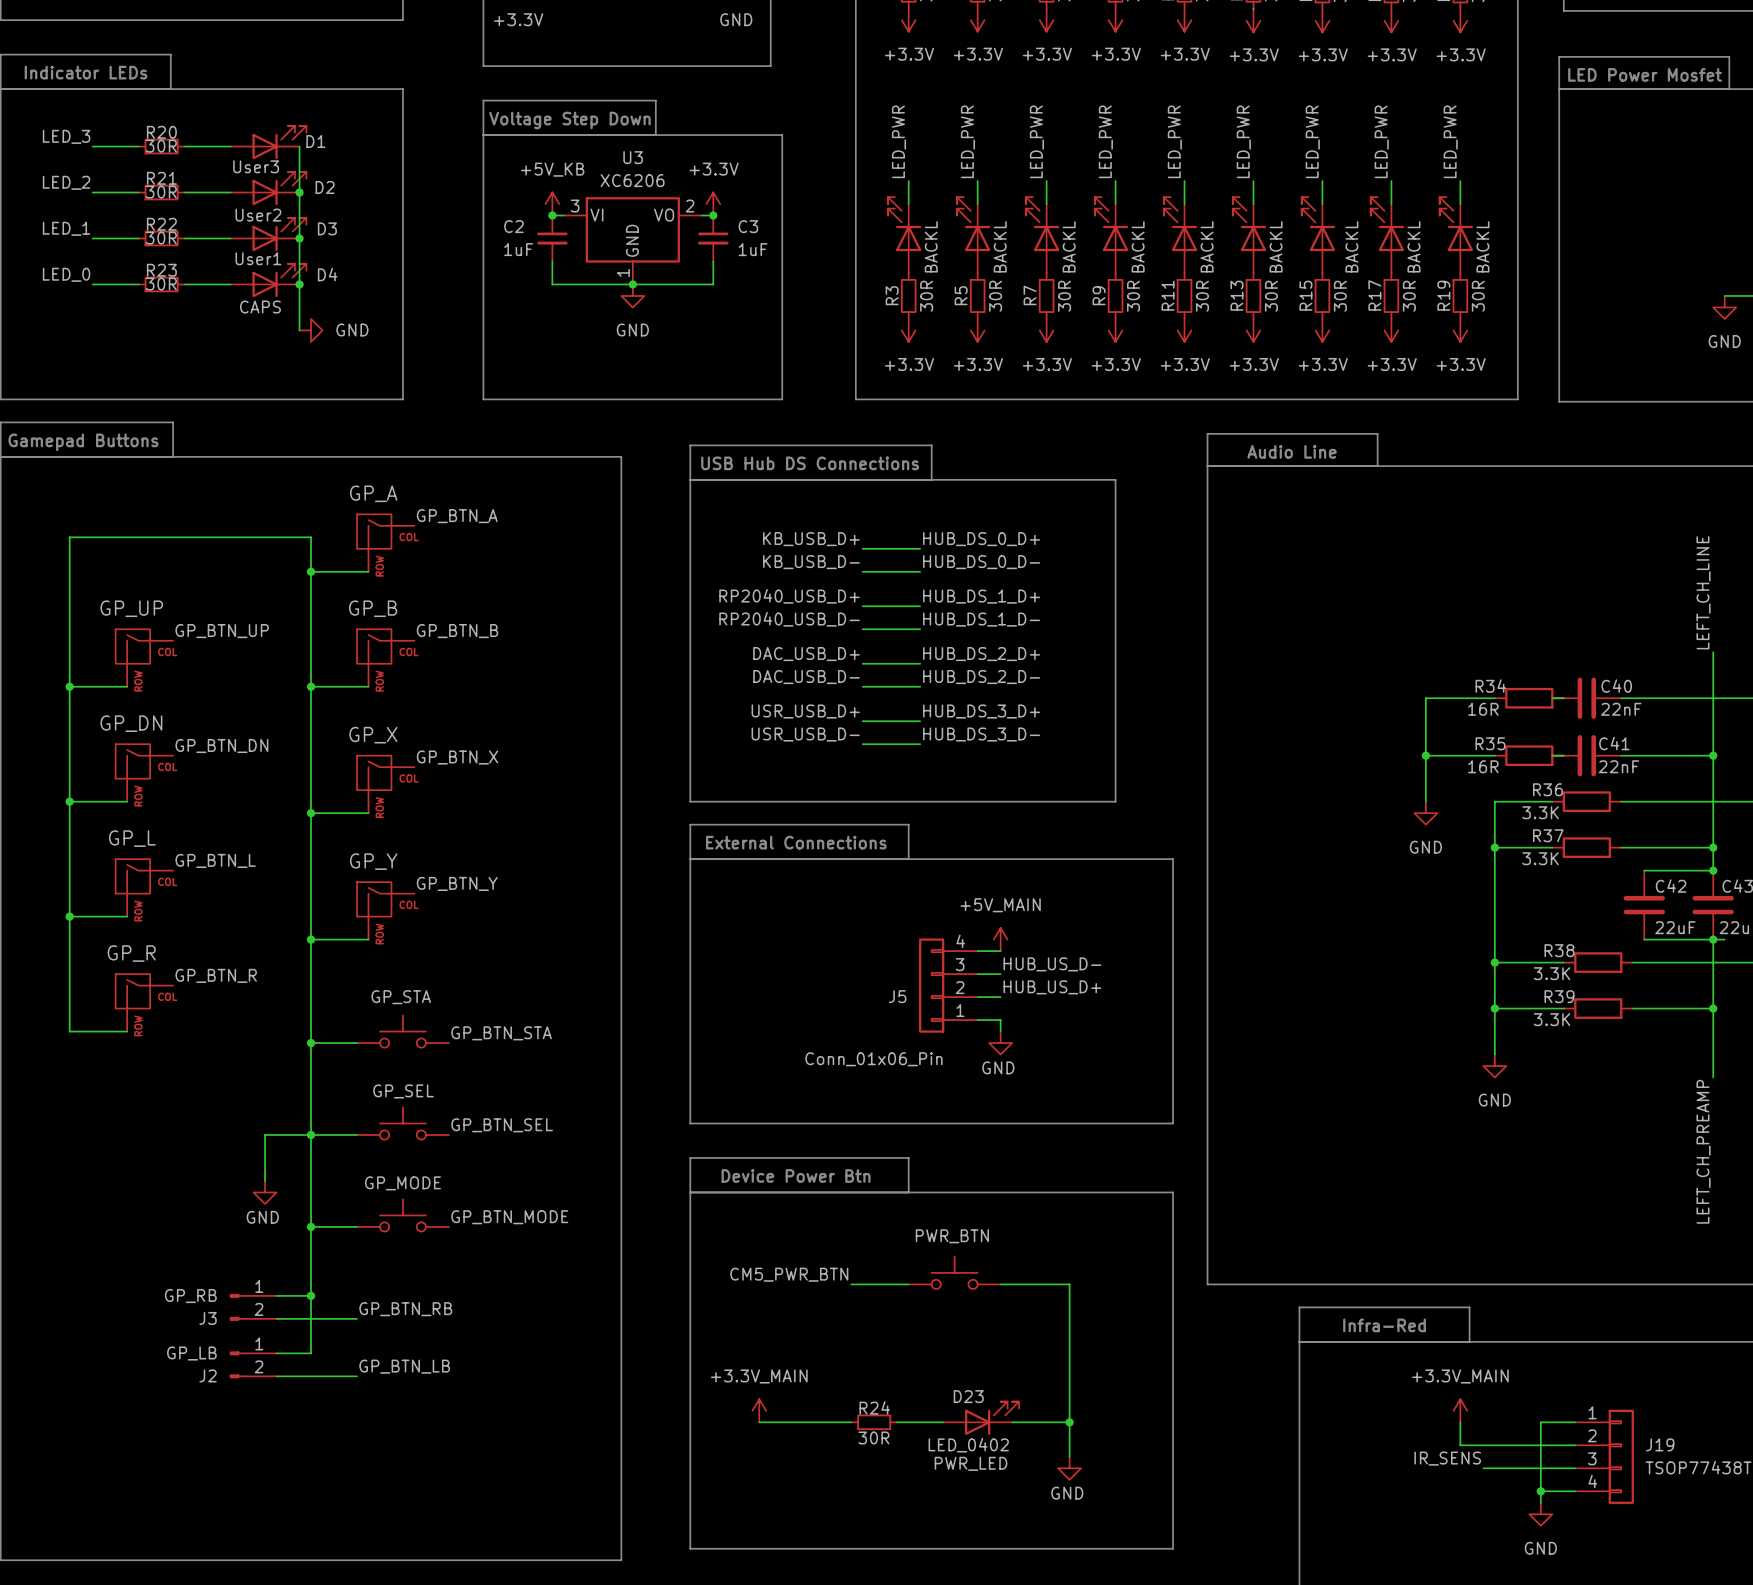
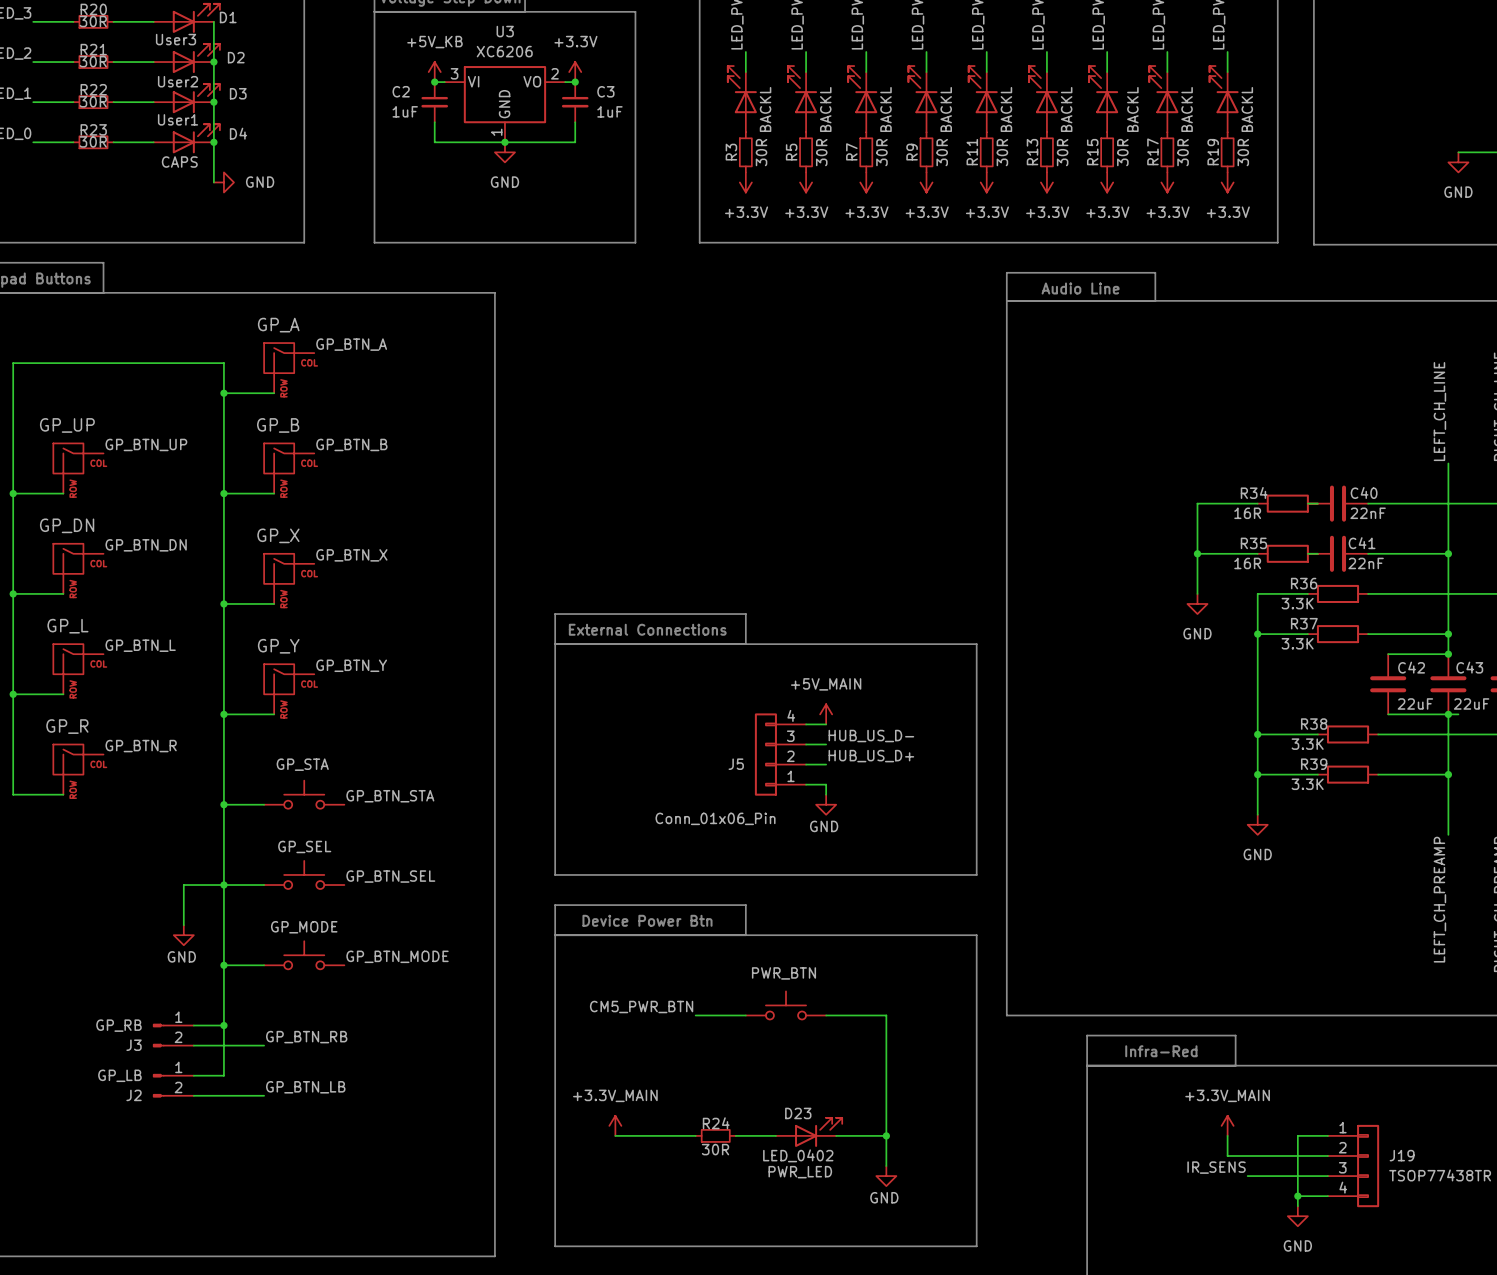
text: USB Hub DS Connections (810, 463) -> none
line: (690, 479) (1115, 479) (1115, 801) (690, 801) (690, 445) (931, 445) (931, 479) -> none
label: KB_USB_D+ (811, 539) -> none
label: HUB_DS_0_D+ (981, 539) -> none
wire: (862, 548) (920, 548) -> none
label: KB_USB_D- (811, 562) -> none
label: HUB_DS_0_D- (981, 562) -> none
wire: (862, 571) (920, 571) -> none
label: RP2040_USB_D+ (789, 596) -> none
label: HUB_DS_1_D+ (981, 596) -> none
wire: (862, 606) (920, 606) -> none
label: RP2040_USB_D- (789, 619) -> none
label: HUB_DS_1_D- (981, 619) -> none
wire: (862, 629) (920, 629) -> none
label: DAC_USB_D+ (806, 654) -> none
label: HUB_DS_2_D+ (981, 654) -> none
wire: (862, 663) (920, 663) -> none
label: DAC_USB_D- (806, 677) -> none
label: HUB_DS_2_D- (981, 677) -> none
wire: (862, 686) (920, 686) -> none
label: USR_USB_D+ (805, 711) -> none
label: HUB_DS_3_D+ (981, 711) -> none
wire: (862, 721) (920, 721) -> none
label: USR_USB_D- (805, 734) -> none
label: HUB_DS_3_D- (981, 734) -> none
wire: (862, 744) (920, 744) -> none

